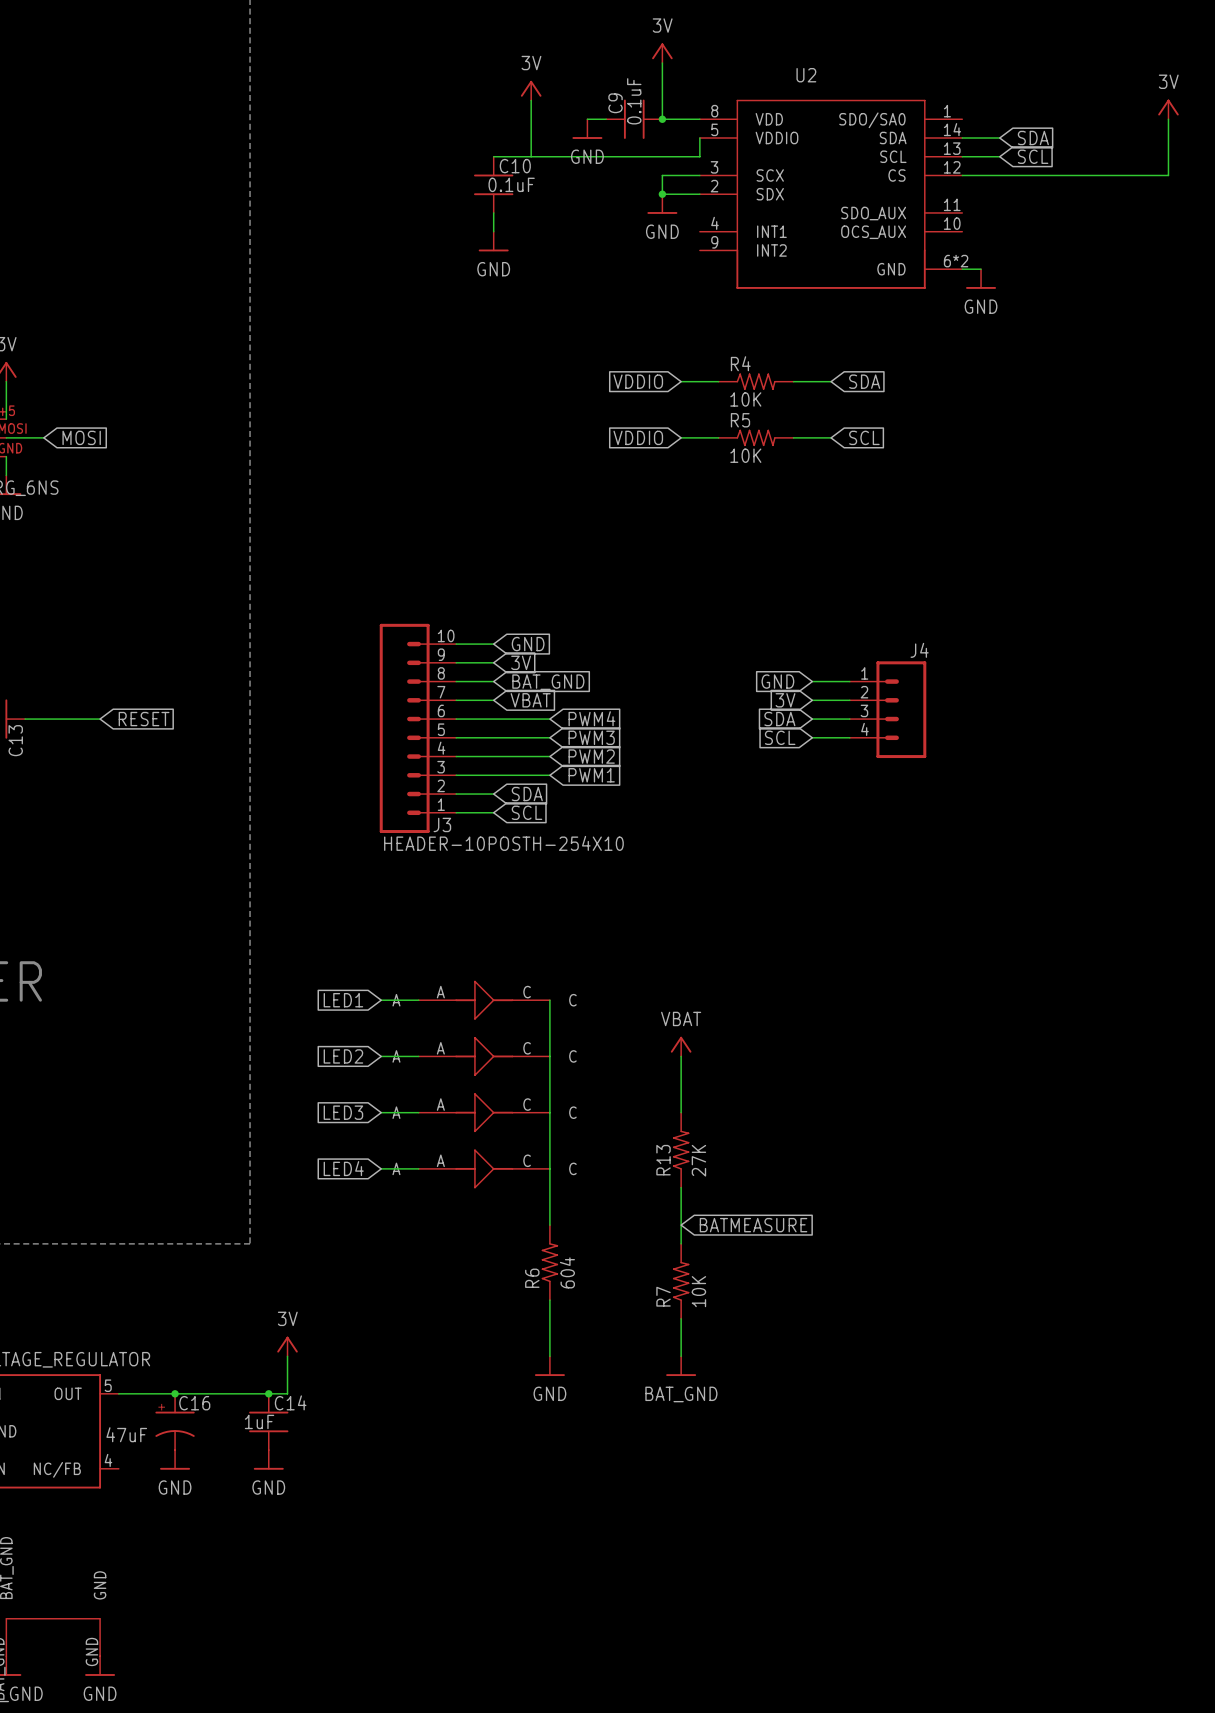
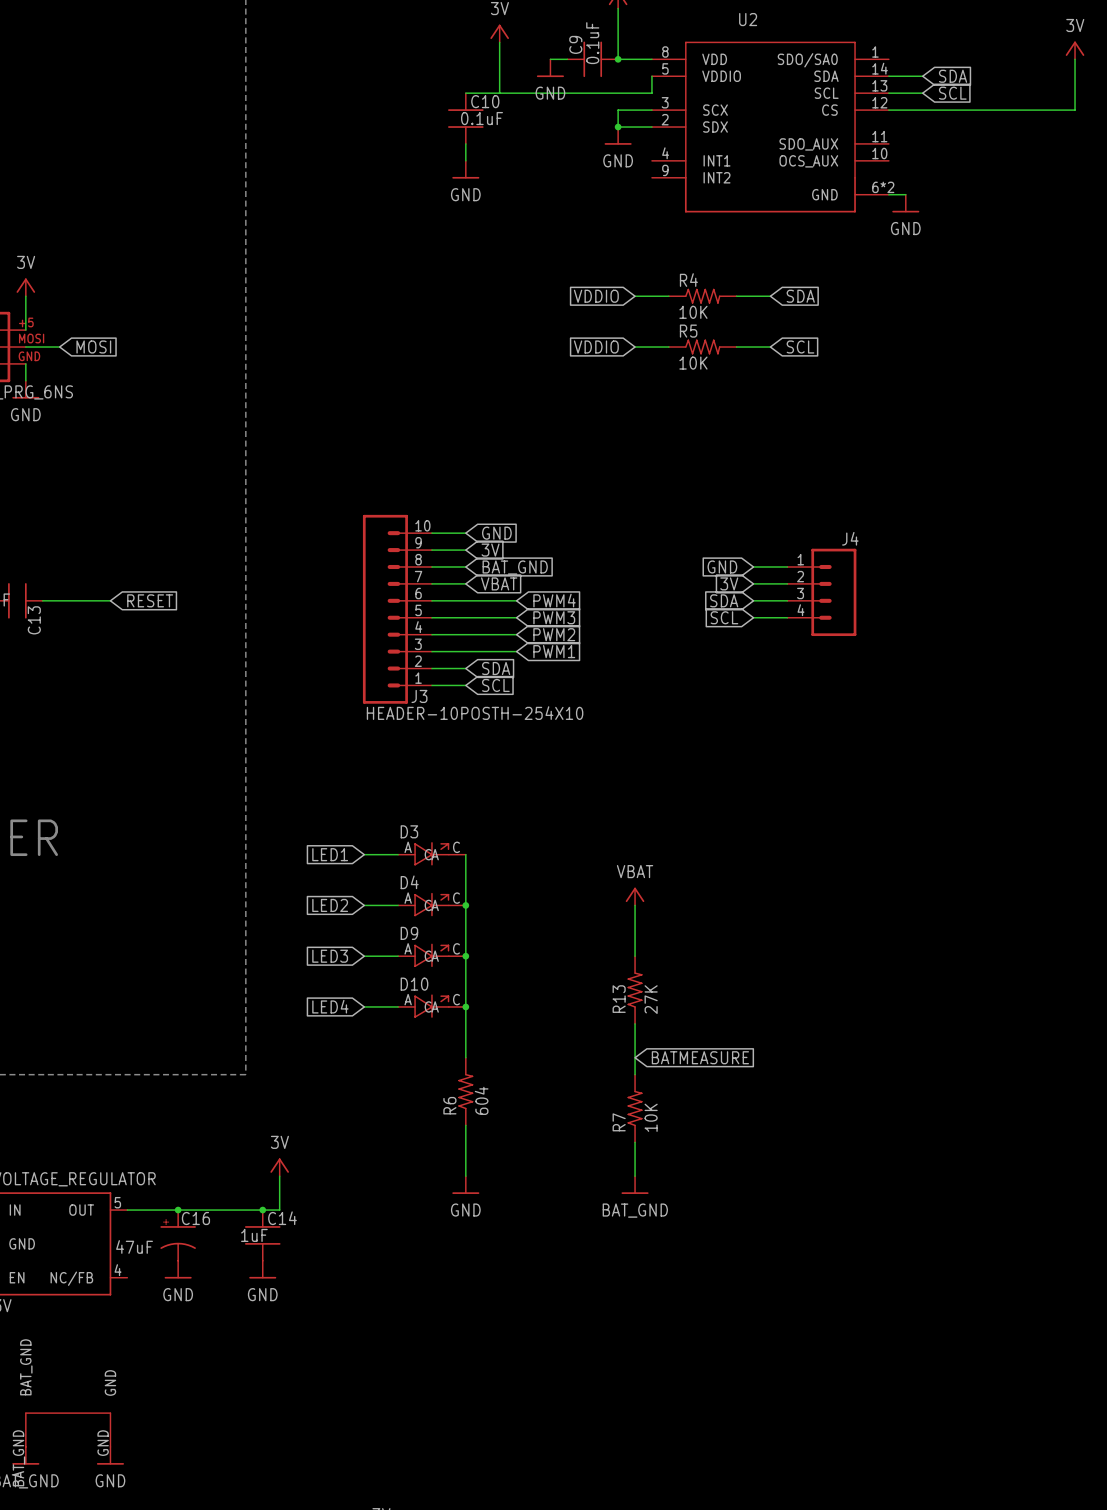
D3: none -> (431, 853)
part: (484, 1000) -> none
wire: (549, 1000) (549, 1225) -> (465, 854) (465, 1057)
D4: none -> (431, 904)
part: (484, 1056) -> none
junction: none -> (465, 905)
D9: none -> (431, 955)
part: (484, 1112) -> none
junction: none -> (465, 956)
D10: none -> (431, 1006)
part: (484, 1168) -> none
junction: none -> (465, 1006)
R6 position: (549, 1262) -> (465, 1091)
wire: (549, 1300) (549, 1356) -> (465, 1125) (465, 1176)
power symbol position: GND (549, 1366) -> GND (465, 1185)

